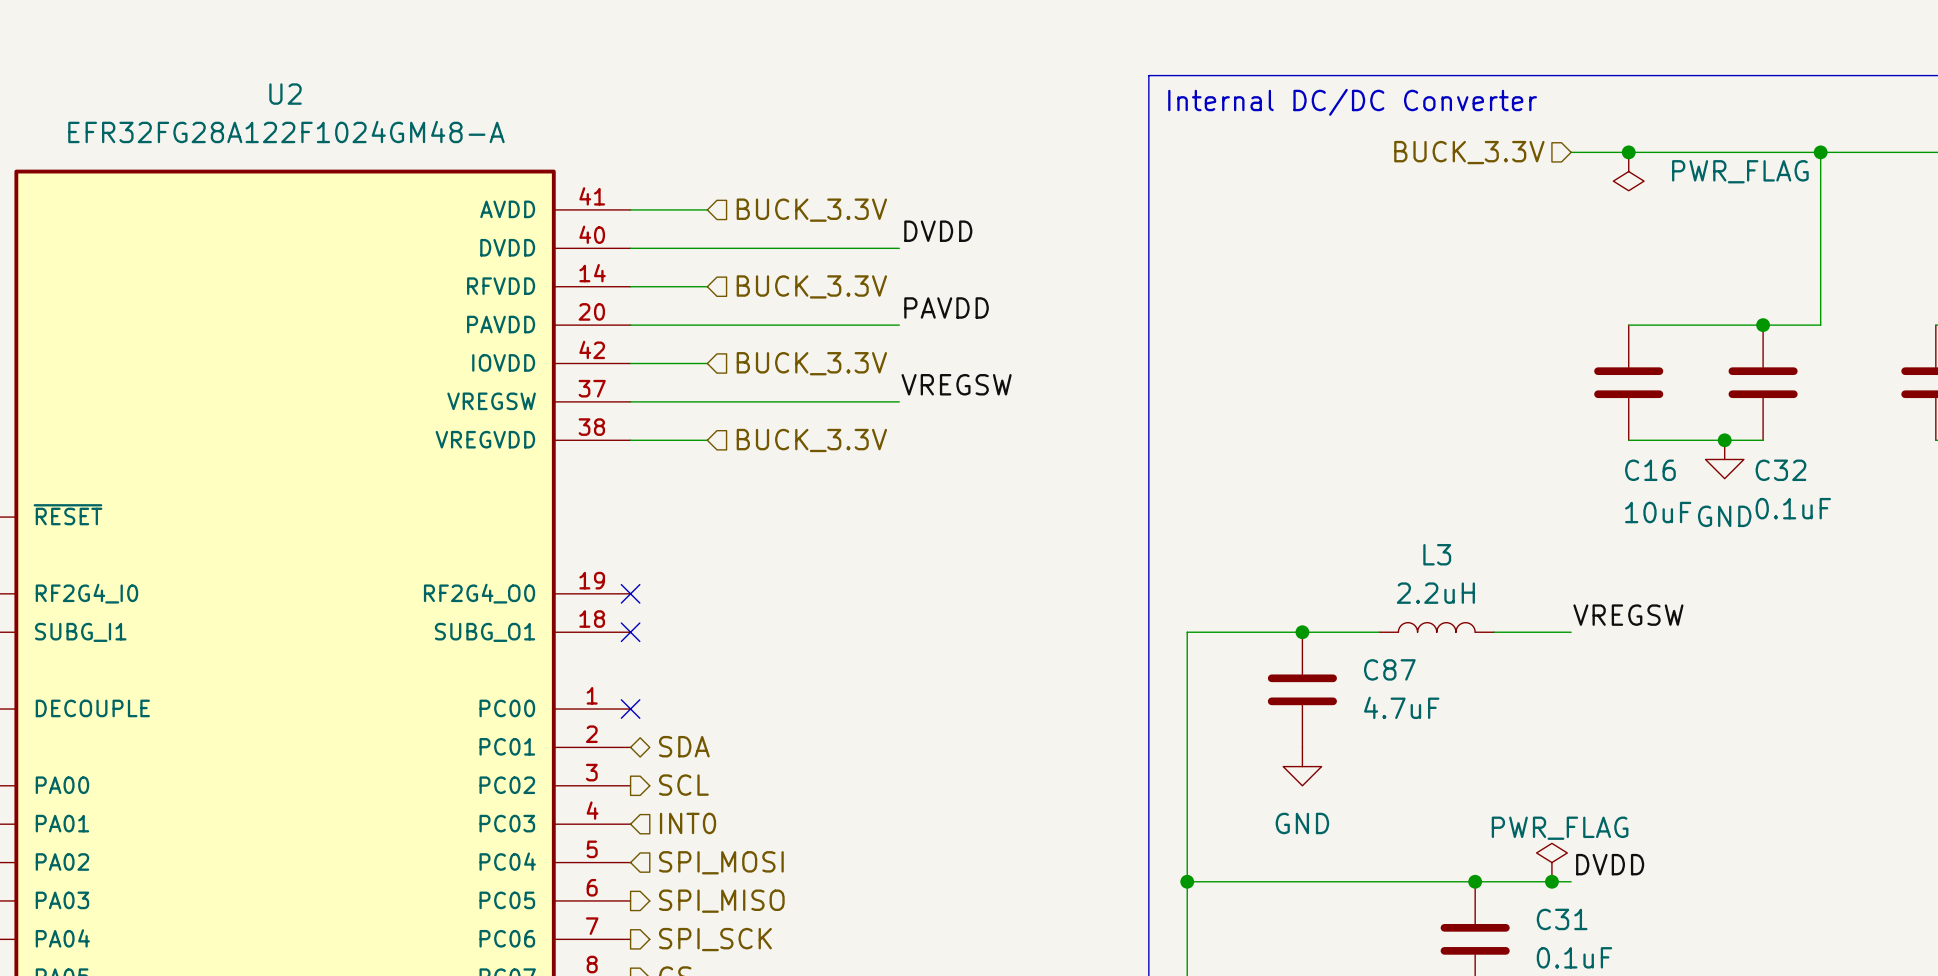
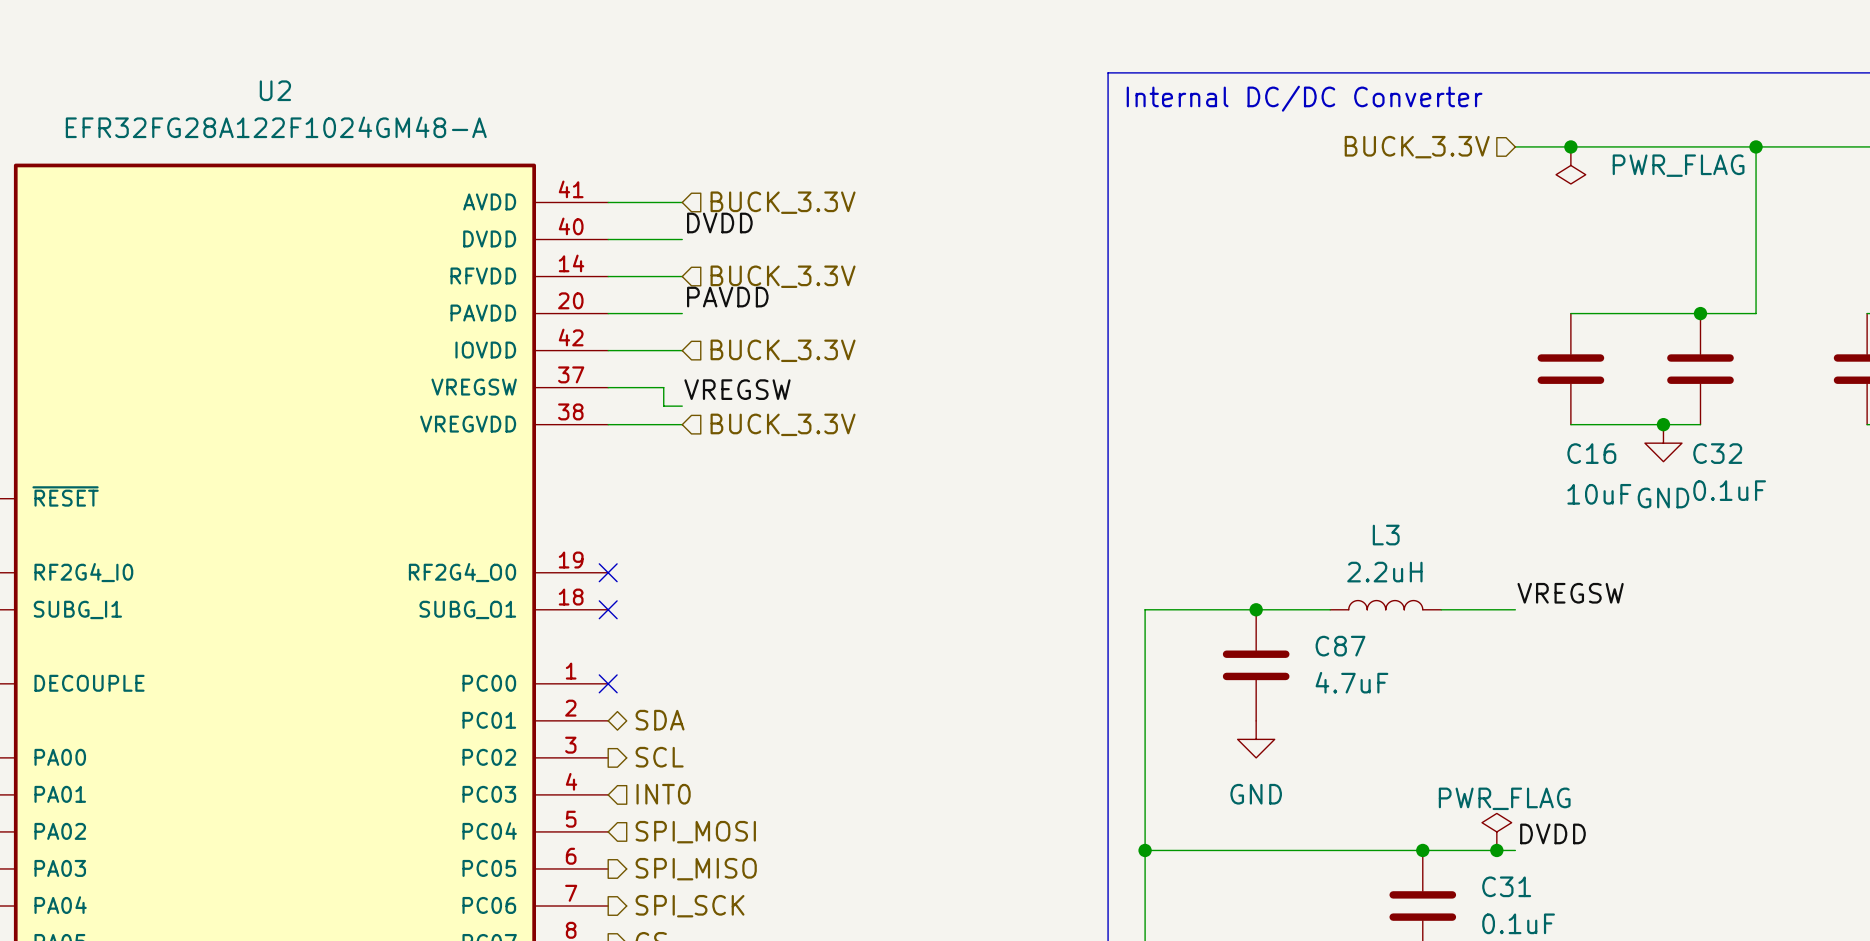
label position: DVDD (938, 231) -> DVDD (719, 222)
wire: (707, 248) (899, 248) -> none
label position: PAVDD (946, 307) -> PAVDD (727, 297)
wire: (707, 325) (899, 325) -> none
label position: VREGSW (956, 384) -> VREGSW (737, 389)
wire: (688, 401) (899, 401) -> (663, 387) (663, 406) (682, 406)

